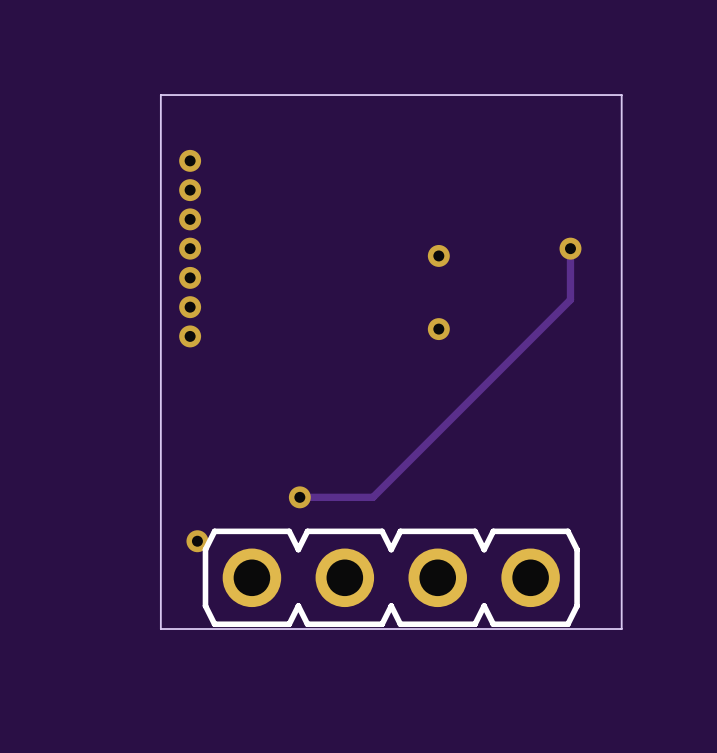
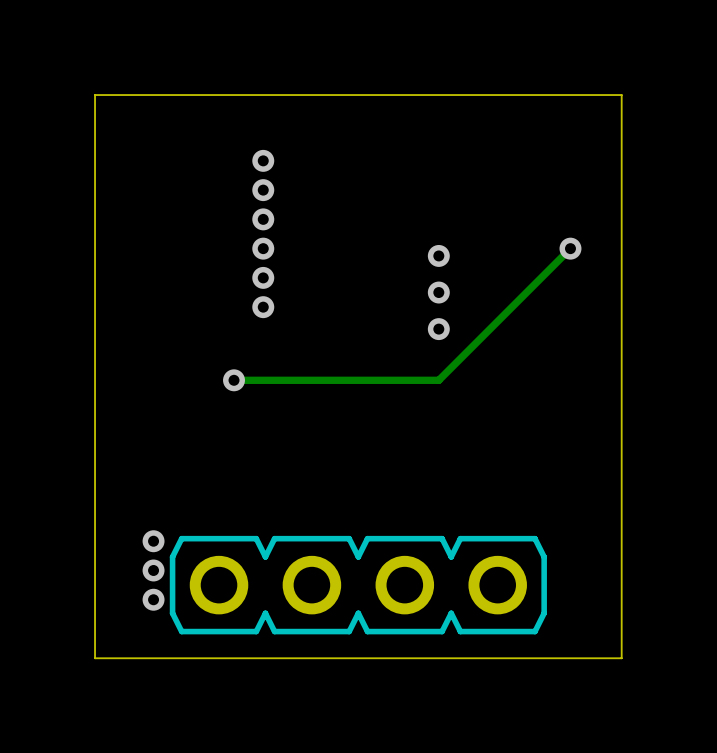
board edge: (160, 95) (160, 629) (621, 629) -> (160, 95) (95, 95) (95, 658) (621, 658) (621, 629)
via: (190, 160) -> none
via: none -> (263, 160)
via: (190, 190) -> none
via: none -> (263, 190)
via: (190, 219) -> none
via: none -> (263, 219)
via: (190, 248) -> none
via: none -> (263, 248)
track: (570, 248) (570, 299) (372, 497) (299, 497) -> (570, 248) (438, 380) (234, 380)
via: (190, 277) -> none
via: none -> (263, 277)
via: none -> (438, 292)
via: (190, 307) -> none
via: none -> (263, 307)
via: (190, 336) -> none
via: none -> (234, 380)
via: (299, 497) -> none
via: none -> (153, 541)
via: (197, 541) -> none
via: none -> (153, 570)
part position: (391, 577) -> (358, 585)
via: none -> (153, 599)

